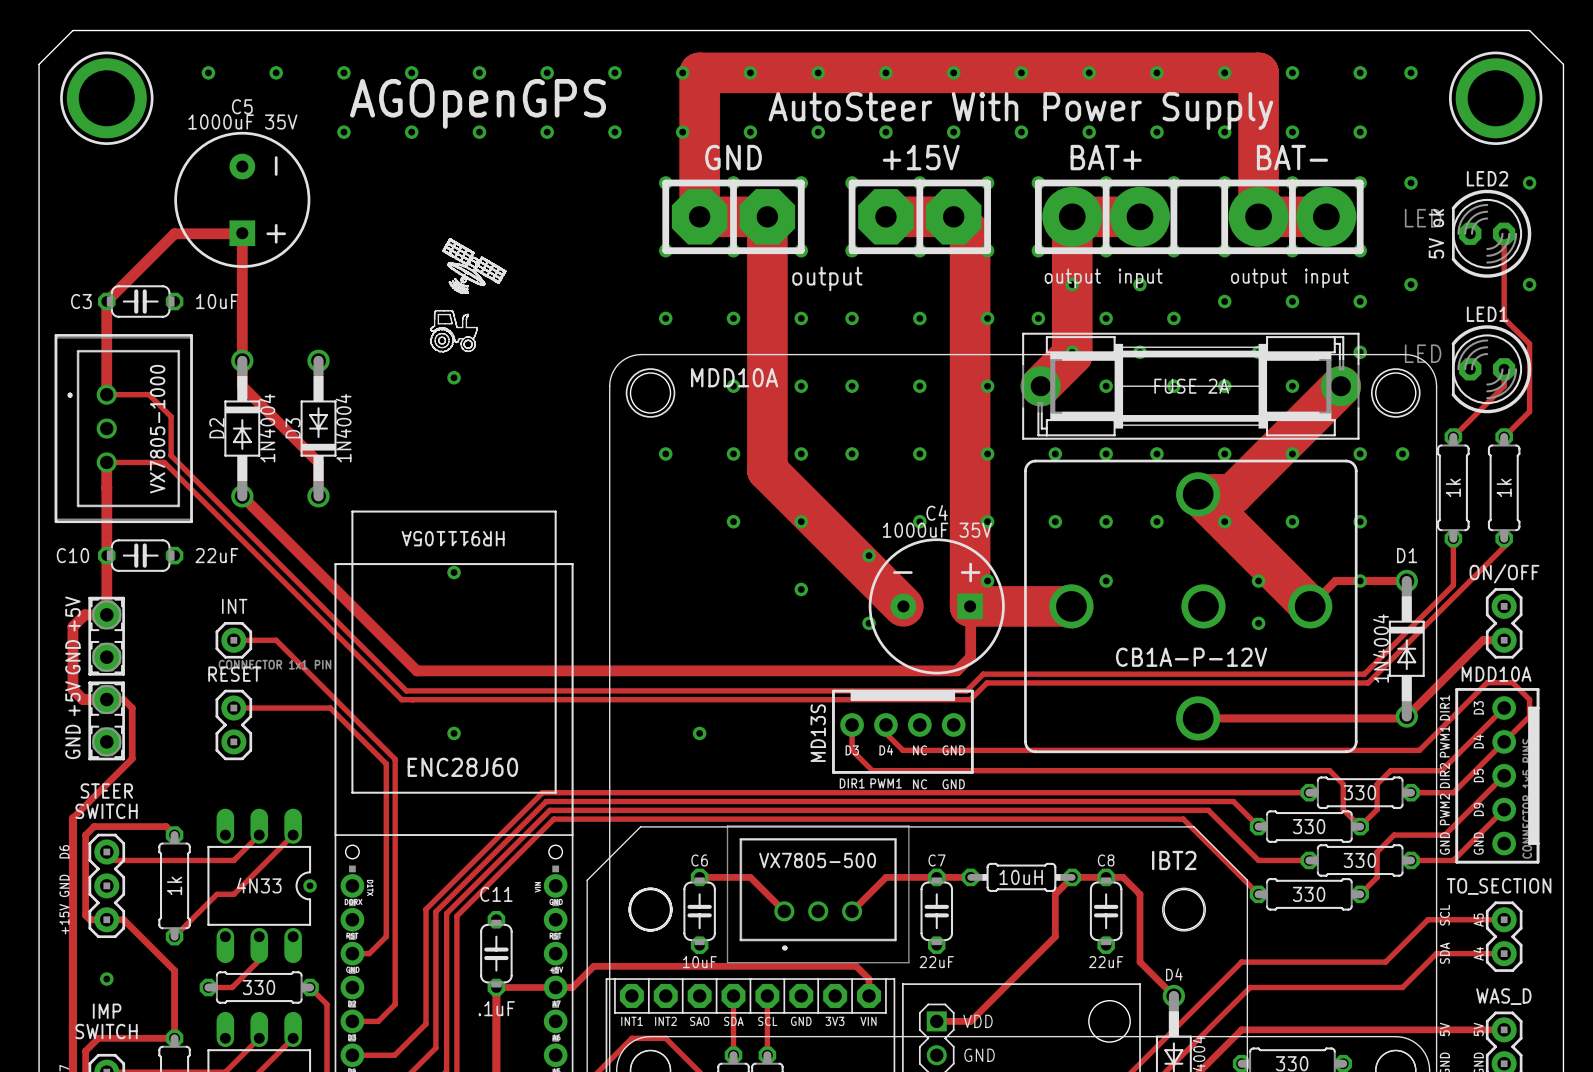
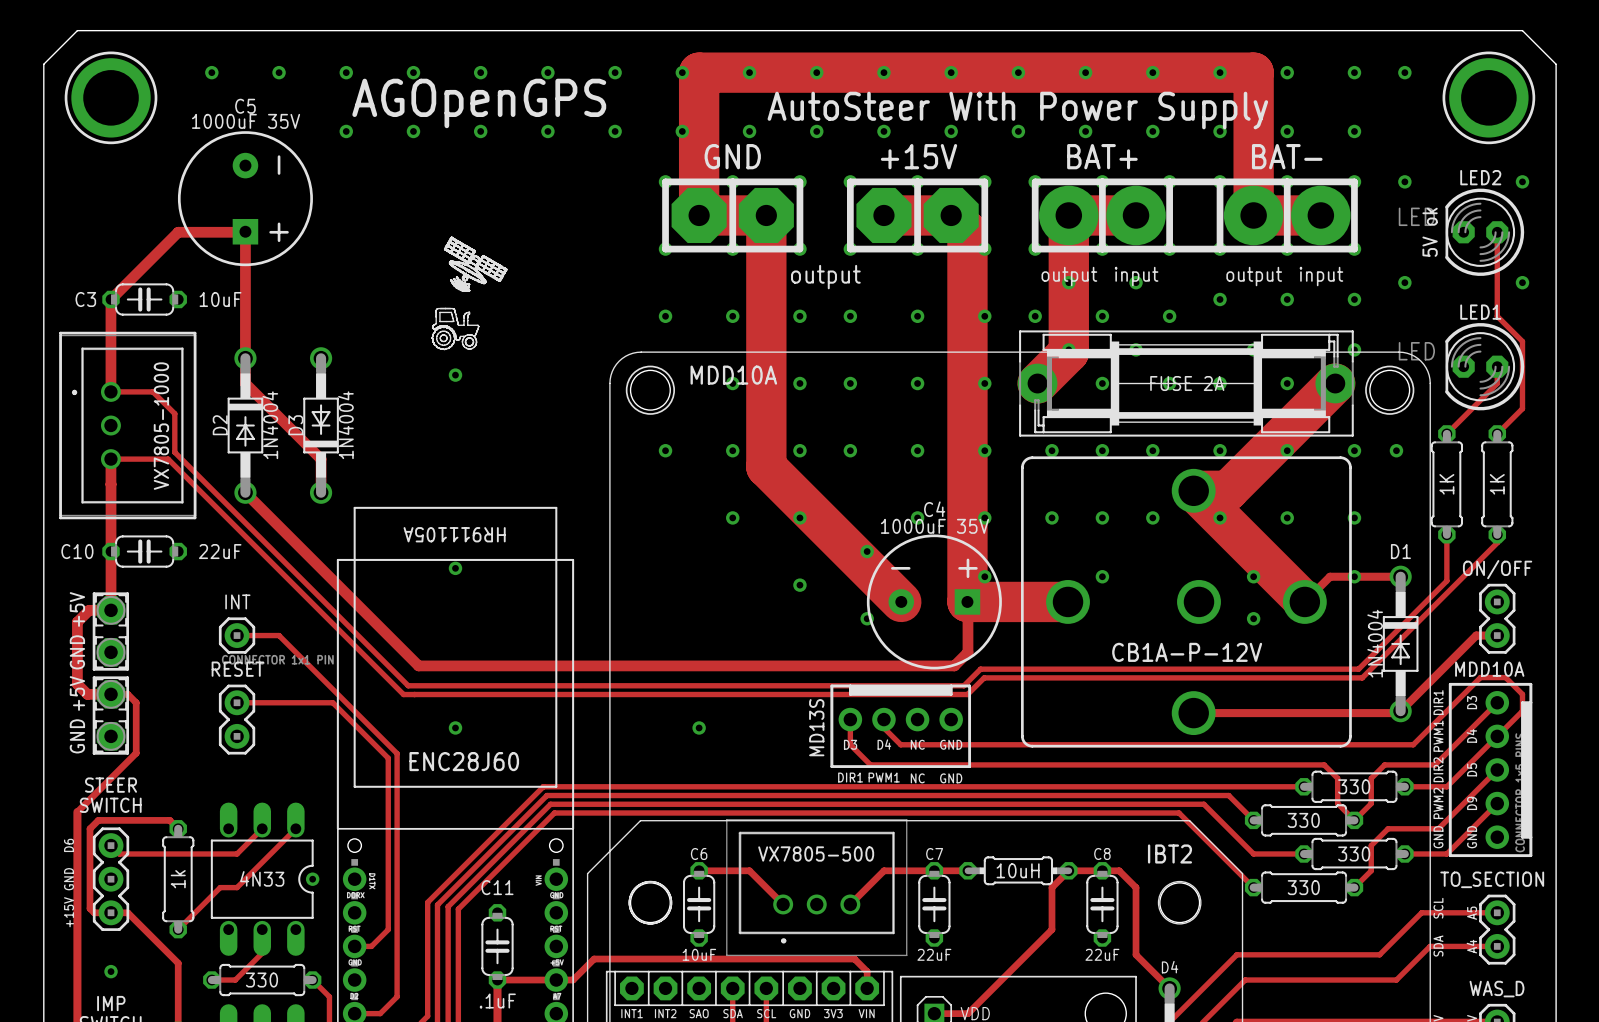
part value: 1k (1453, 487) -> 1K (1446, 484)
part value: 1k (1504, 487) -> 1K (1497, 484)

